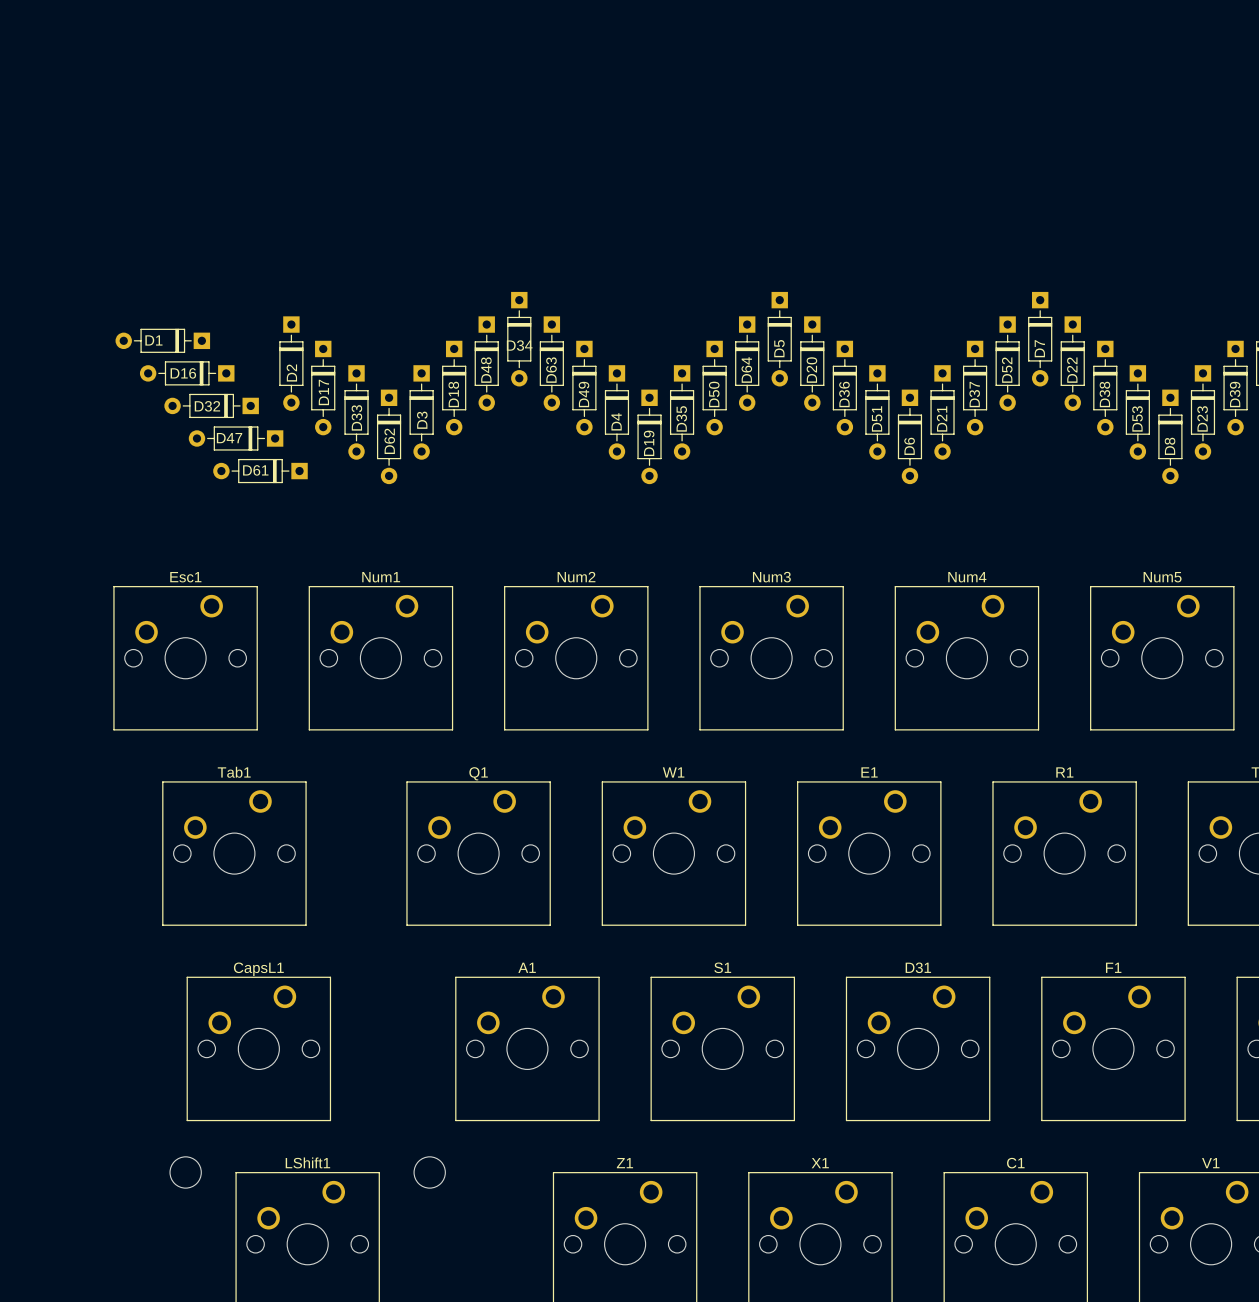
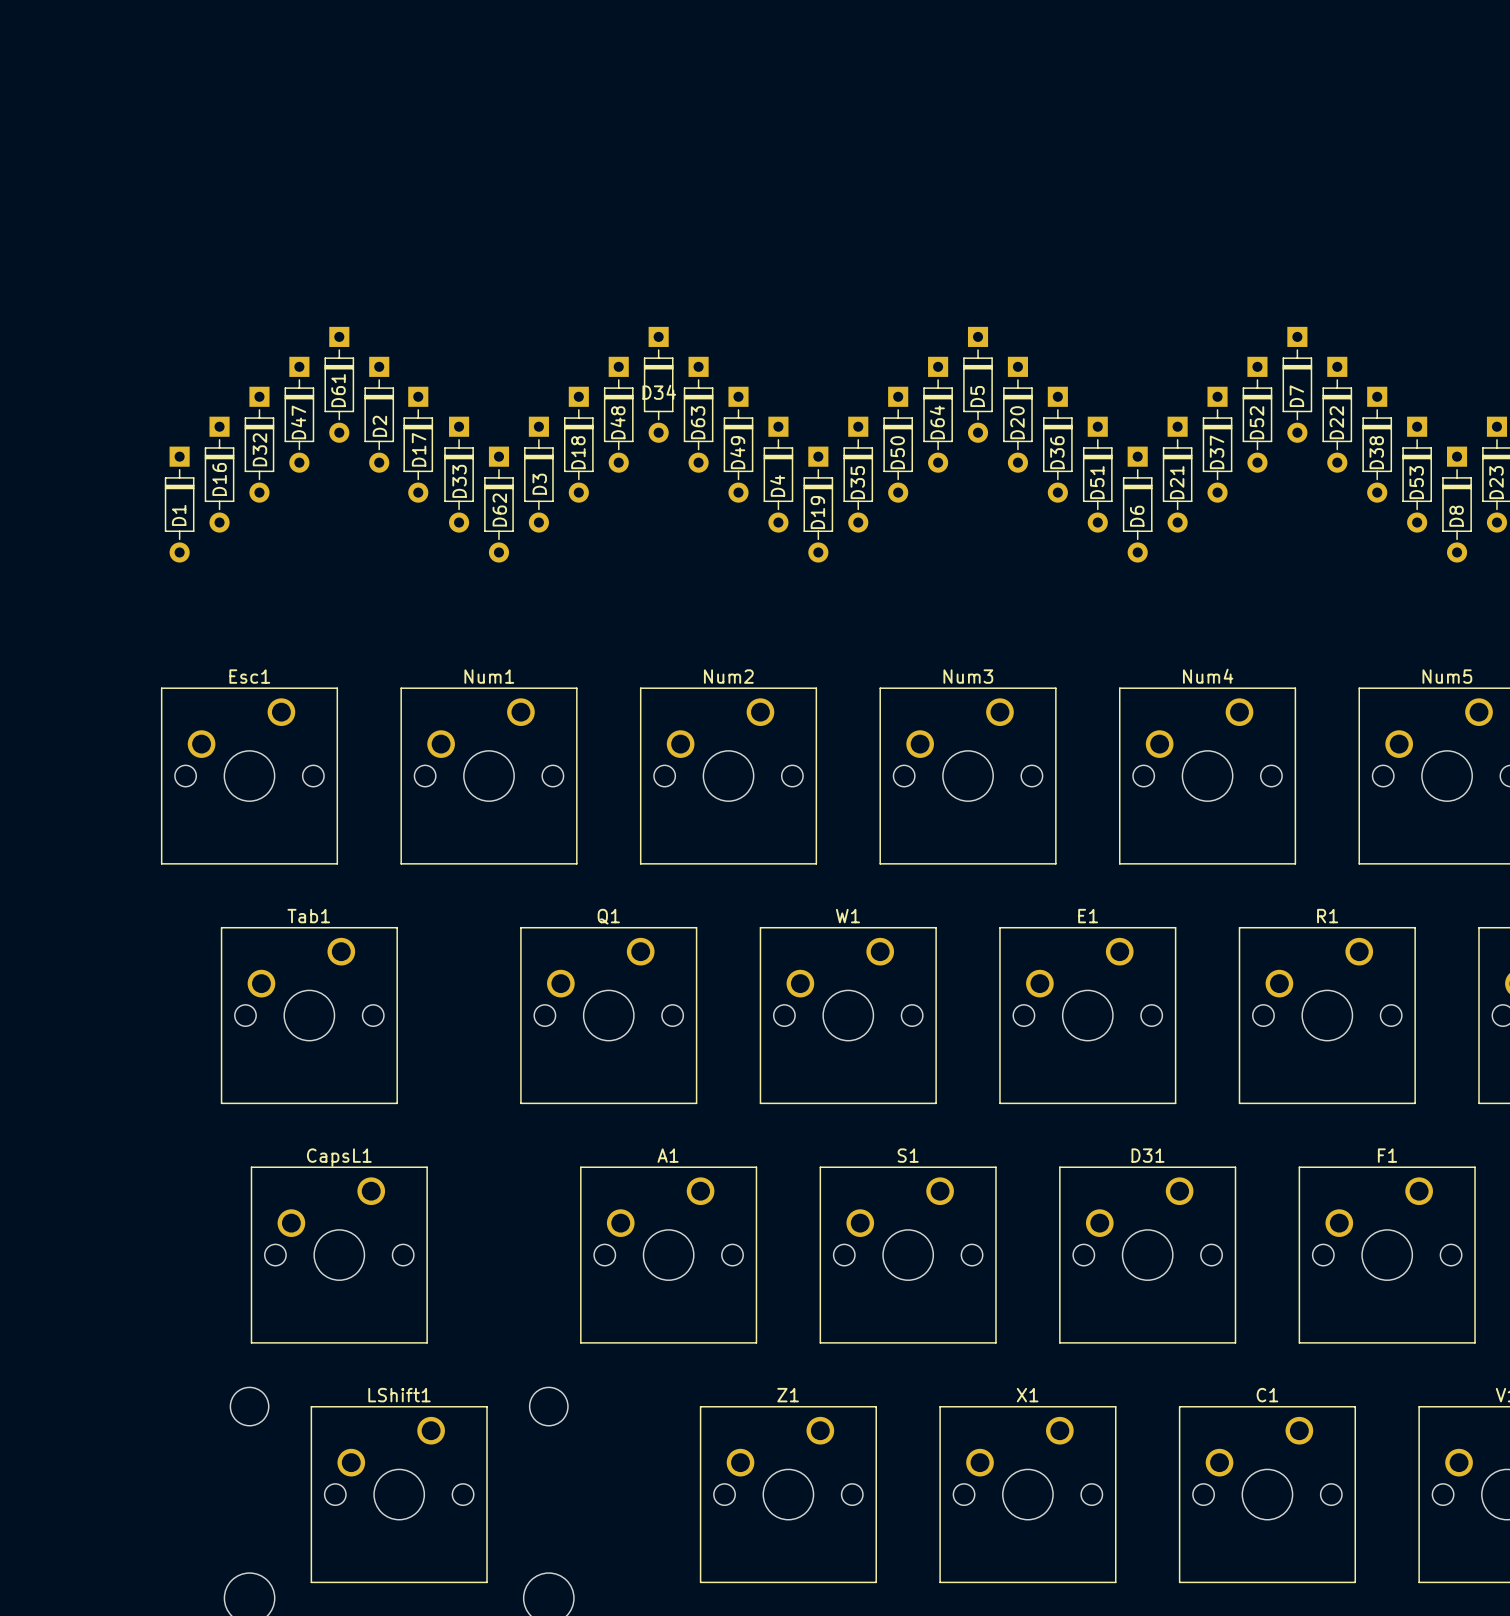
D1 rotation: 0° (162, 340) -> 90° counterclockwise (179, 504)
D1 position: (162, 340) -> (179, 504)
D16 rotation: 0° (187, 373) -> 90° counterclockwise (219, 474)
D32 rotation: 0° (211, 405) -> 90° counterclockwise (259, 444)
D47 rotation: 0° (236, 438) -> 90° counterclockwise (299, 414)
D47 position: (236, 438) -> (299, 414)
D61 rotation: 0° (260, 471) -> 90° counterclockwise (339, 384)
D61 position: (260, 471) -> (339, 384)

